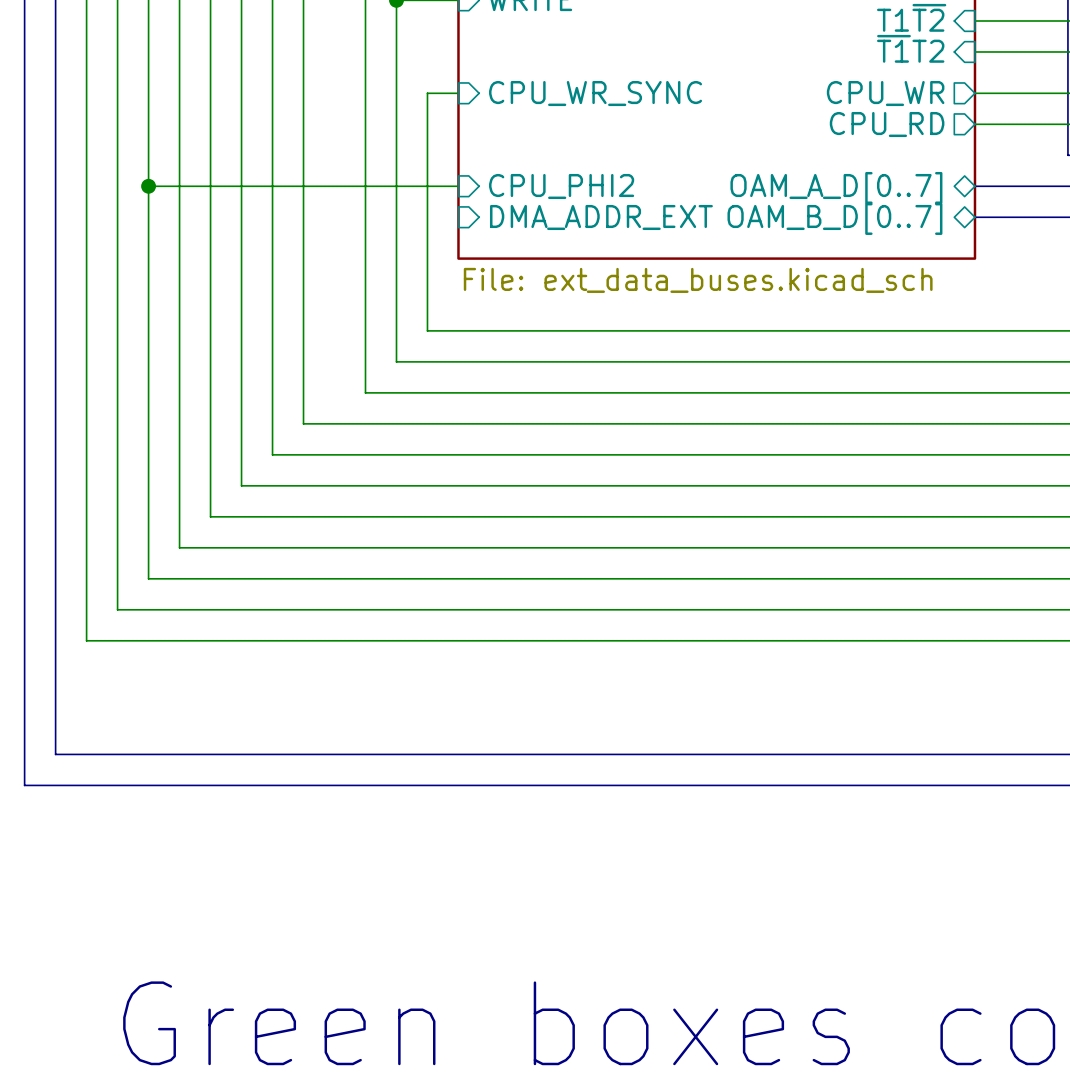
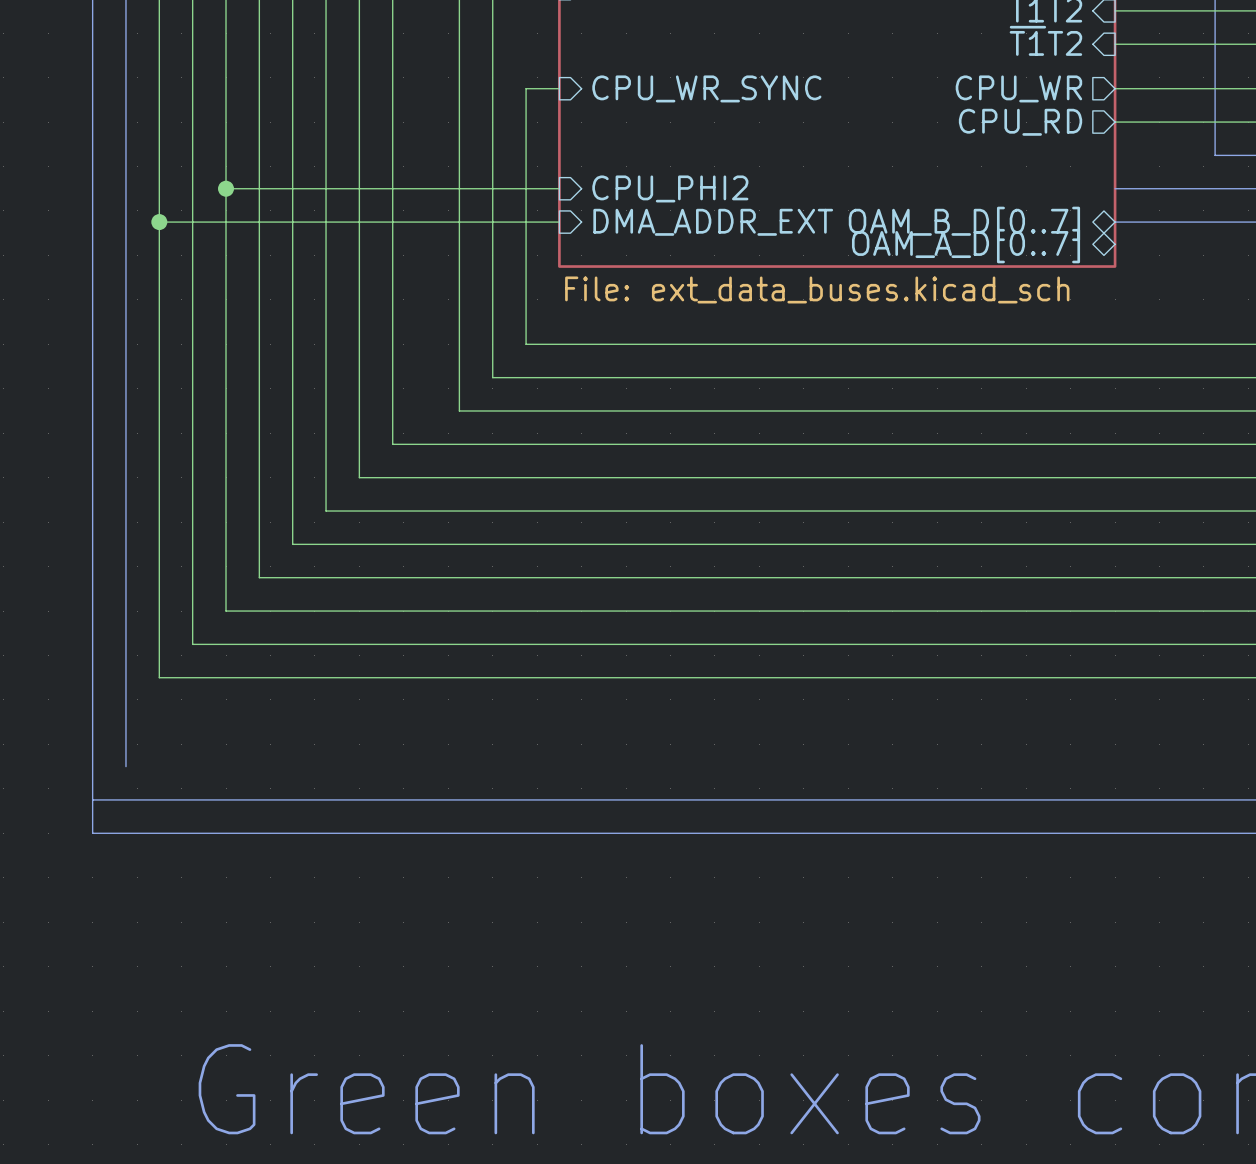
sheet pin position: OAM_A_D[0..7] (836, 187) -> OAM_A_D[0..7] (966, 246)
wire: none -> (159, 222) (559, 222)
junction: none -> (159, 222)
bus: (55, 723) (55, 754) -> (92, 799) (125, 799)

